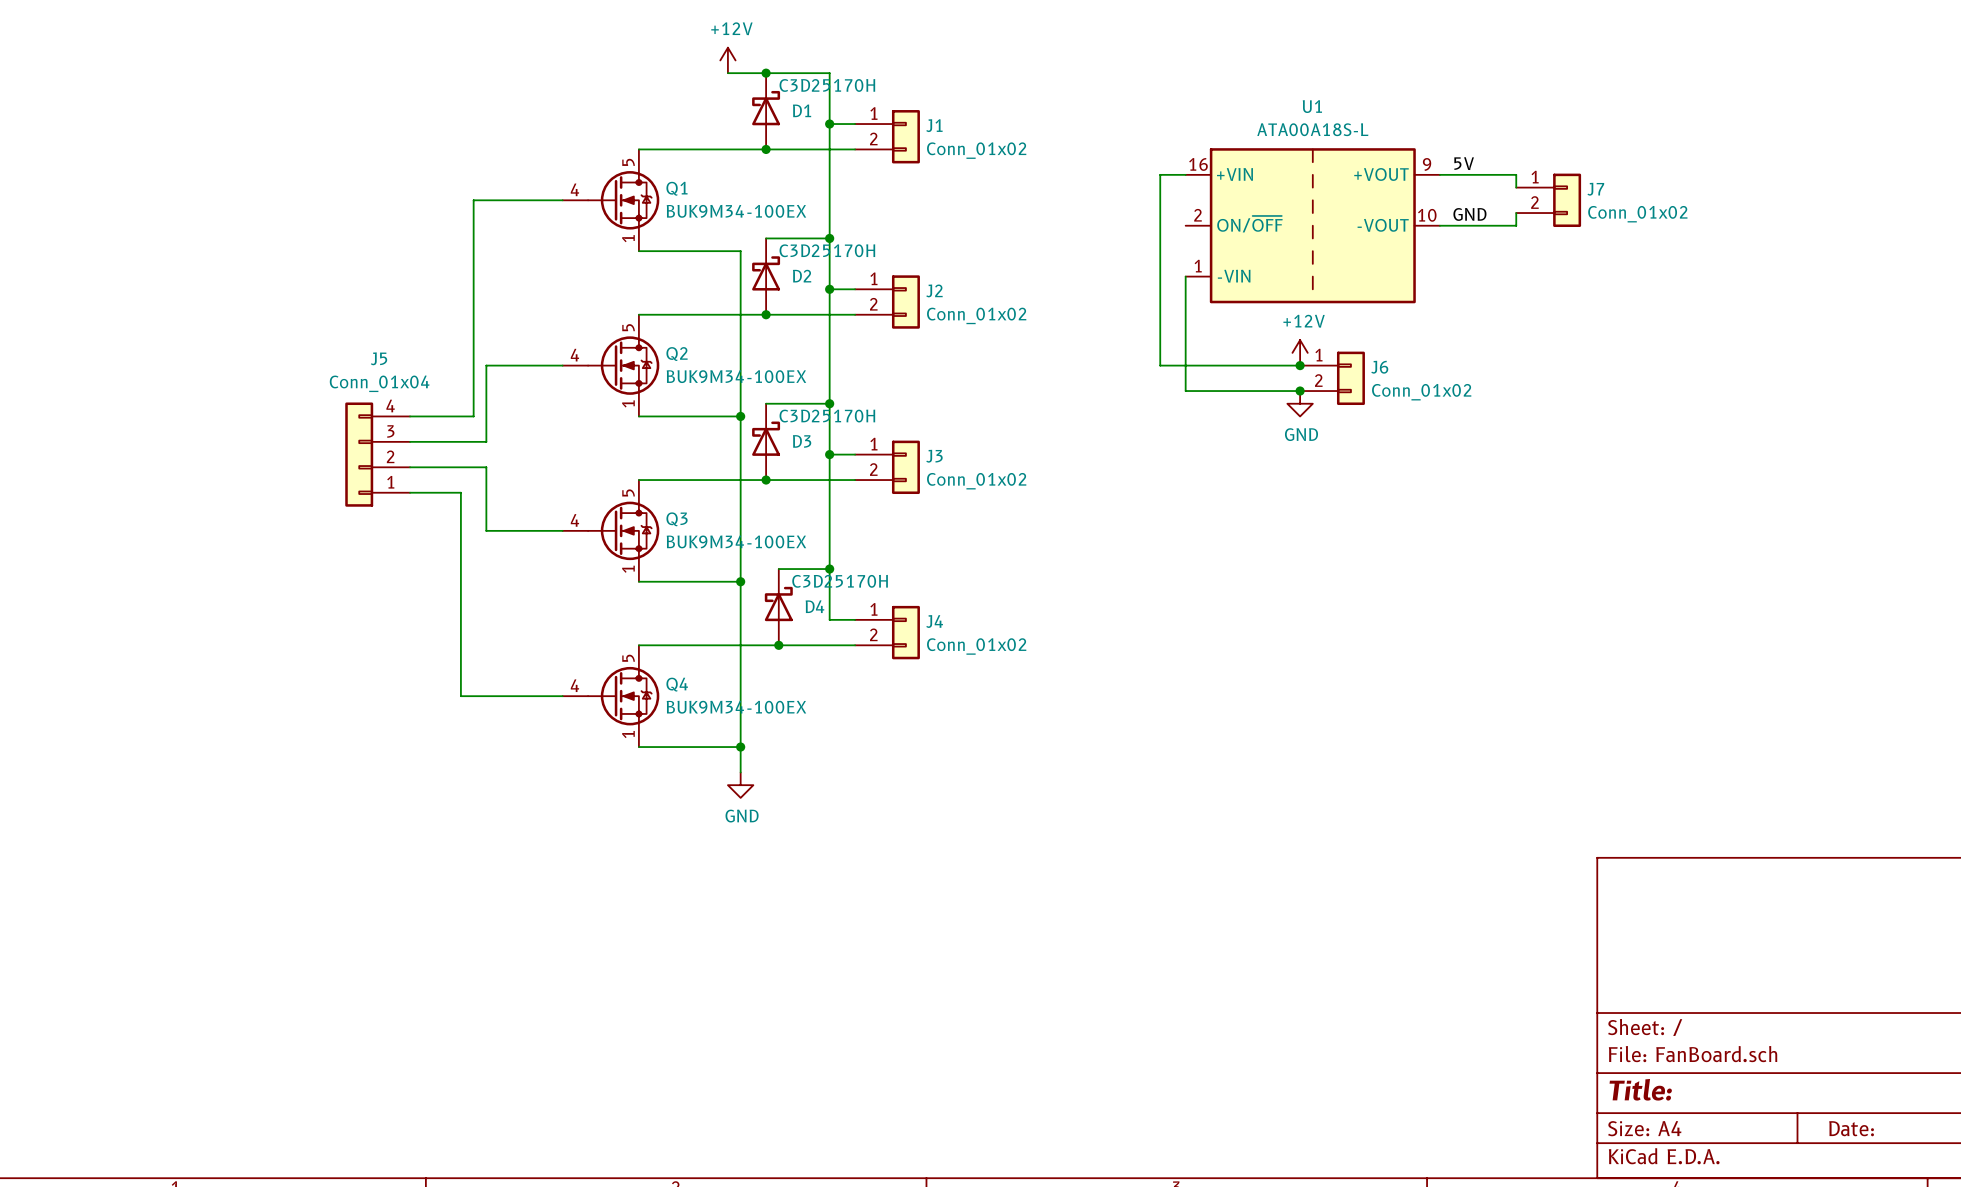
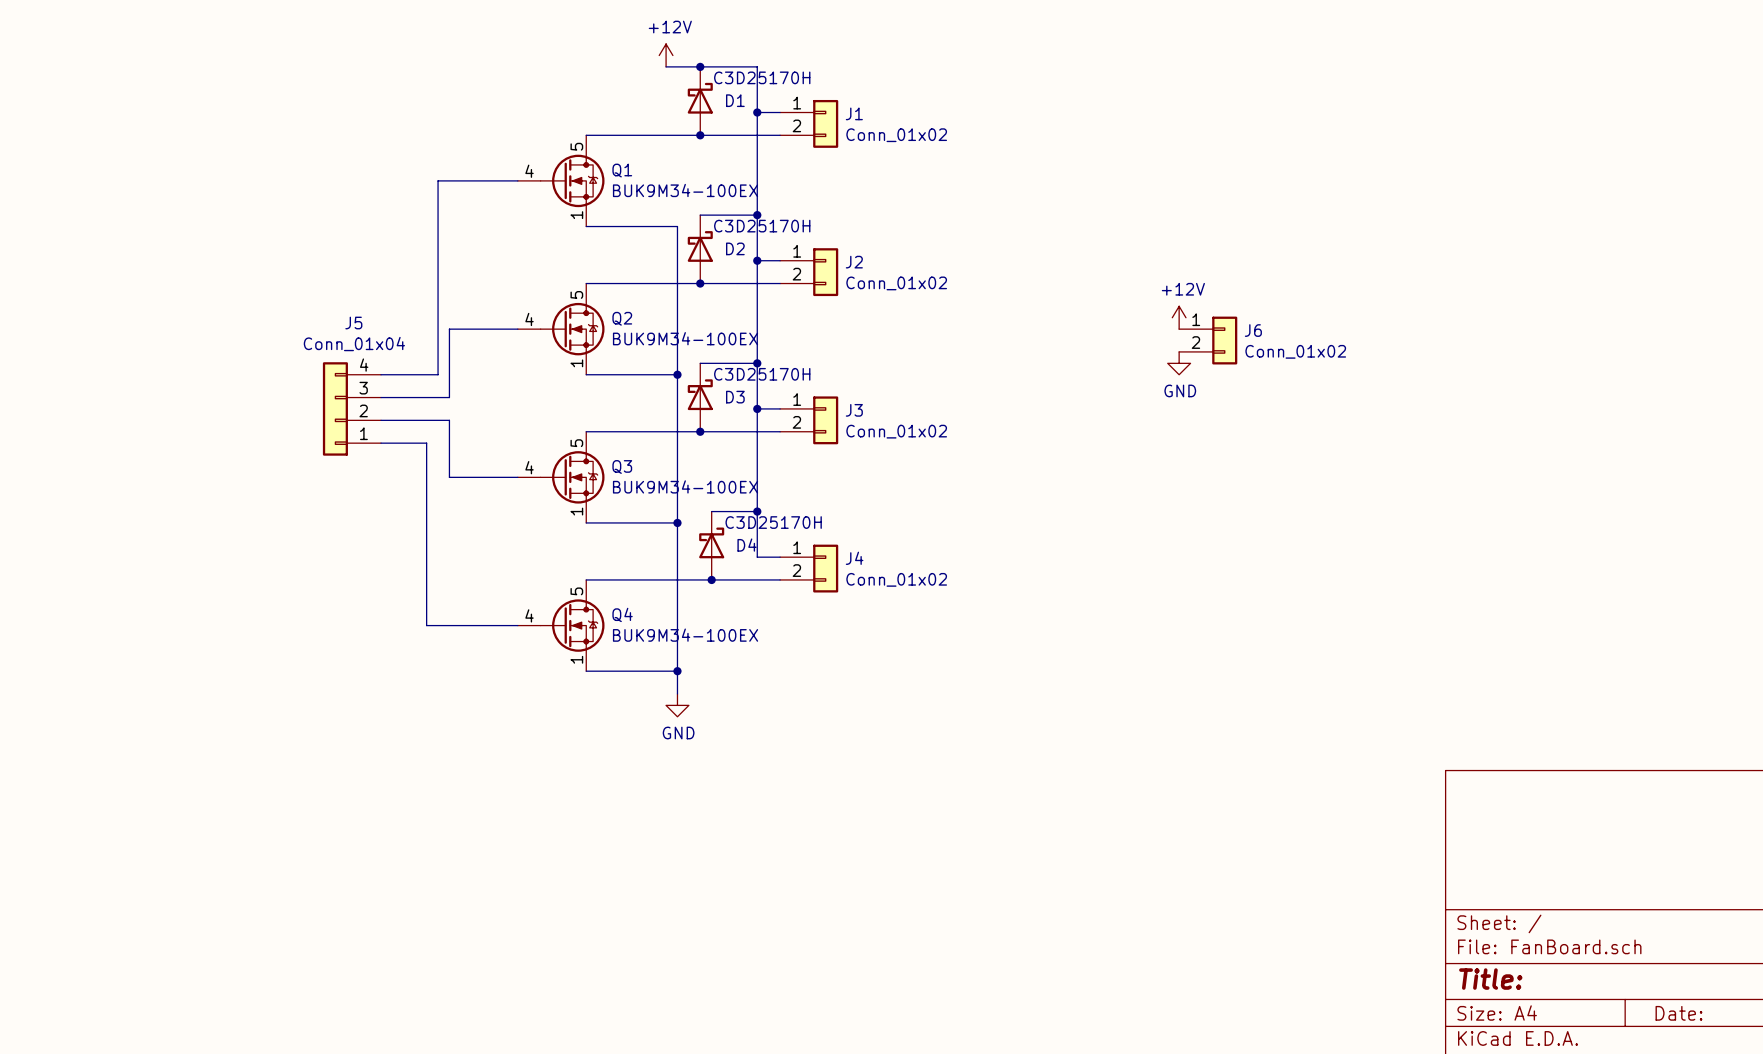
label: 5V (1464, 163) -> none
wire: (1185, 174) (1160, 174) (1160, 365) (1300, 365) -> none
wire: (1439, 174) (1516, 174) (1516, 187) -> none
J7: Conn_01x02 (1548, 200) -> none
wire: (1516, 213) (1516, 225) (1439, 225) -> none
label: GND (1469, 214) -> none
U1: ATA00A18S-L (1312, 225) -> none
wire: (1185, 276) (1185, 391) (1300, 391) -> none
junction: (1300, 365) -> none
junction: (1300, 391) -> none

